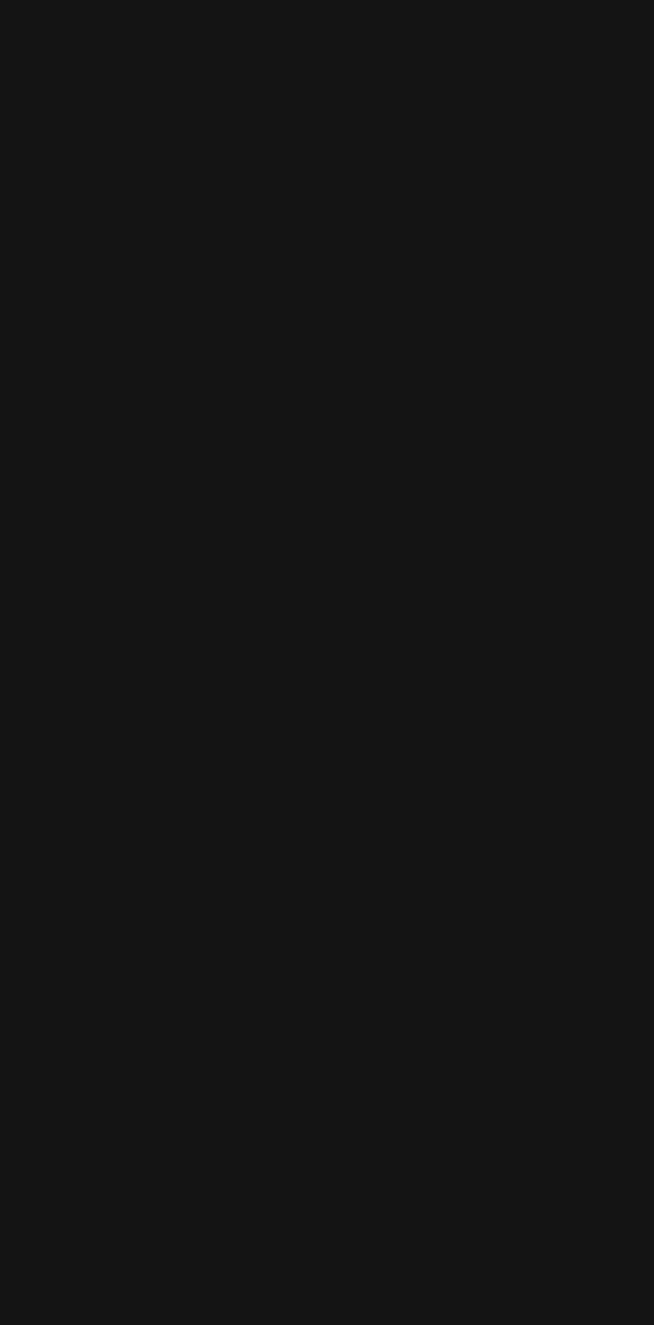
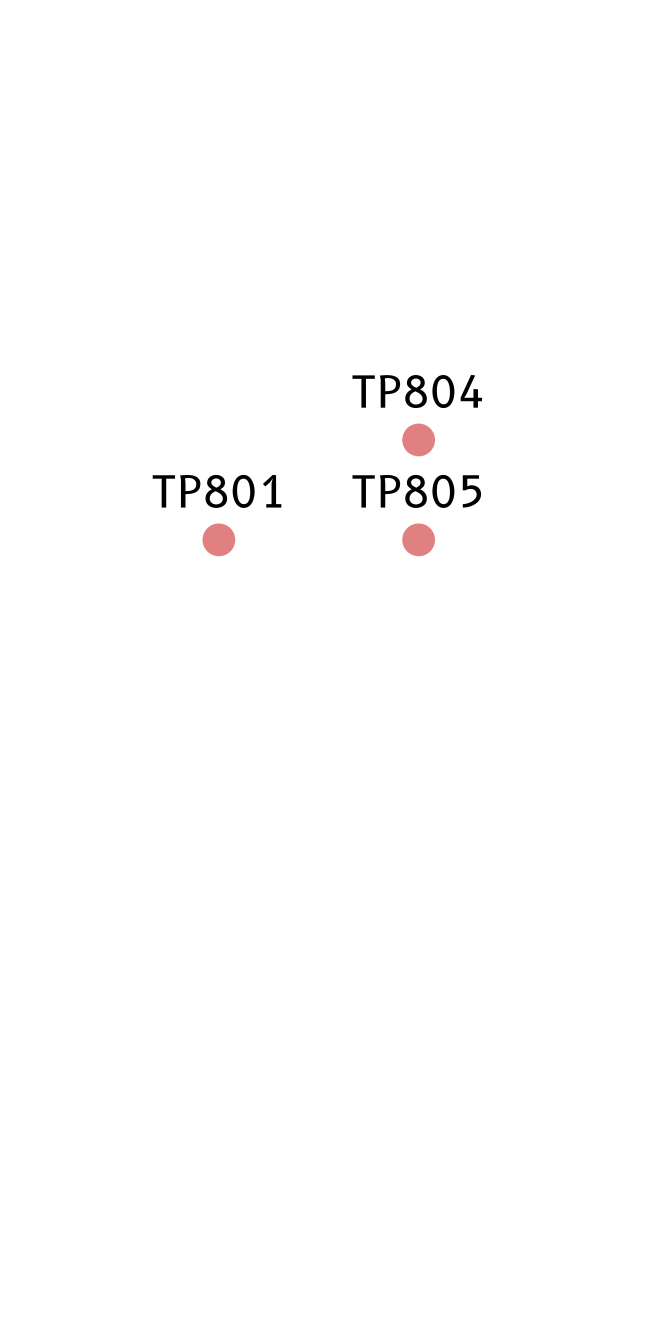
TP804: none -> (418, 439)
TP801: none -> (218, 539)
TP805: none -> (418, 539)

